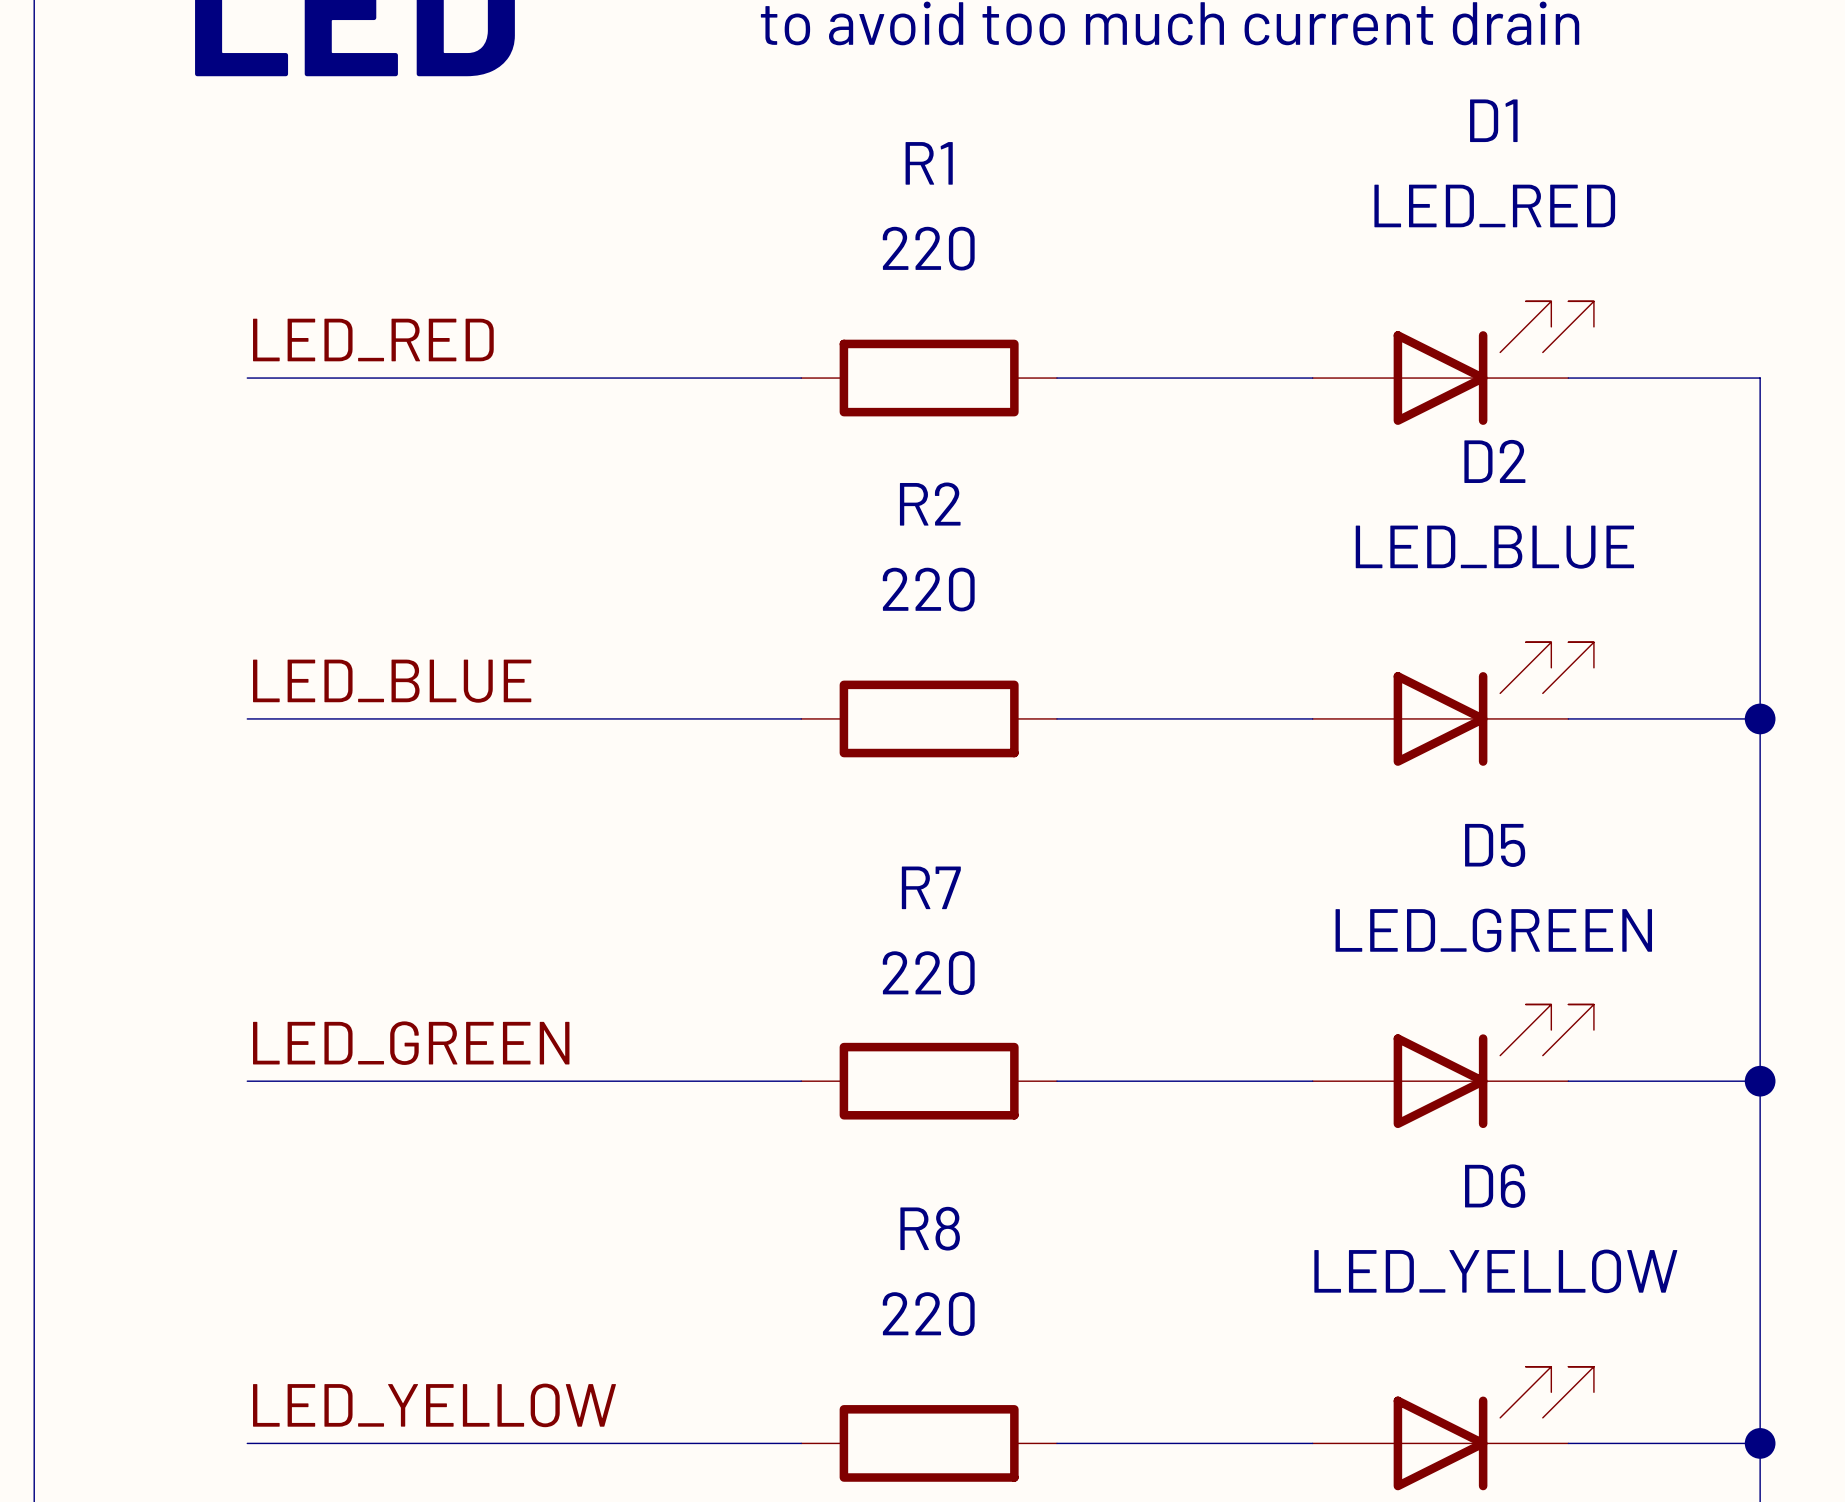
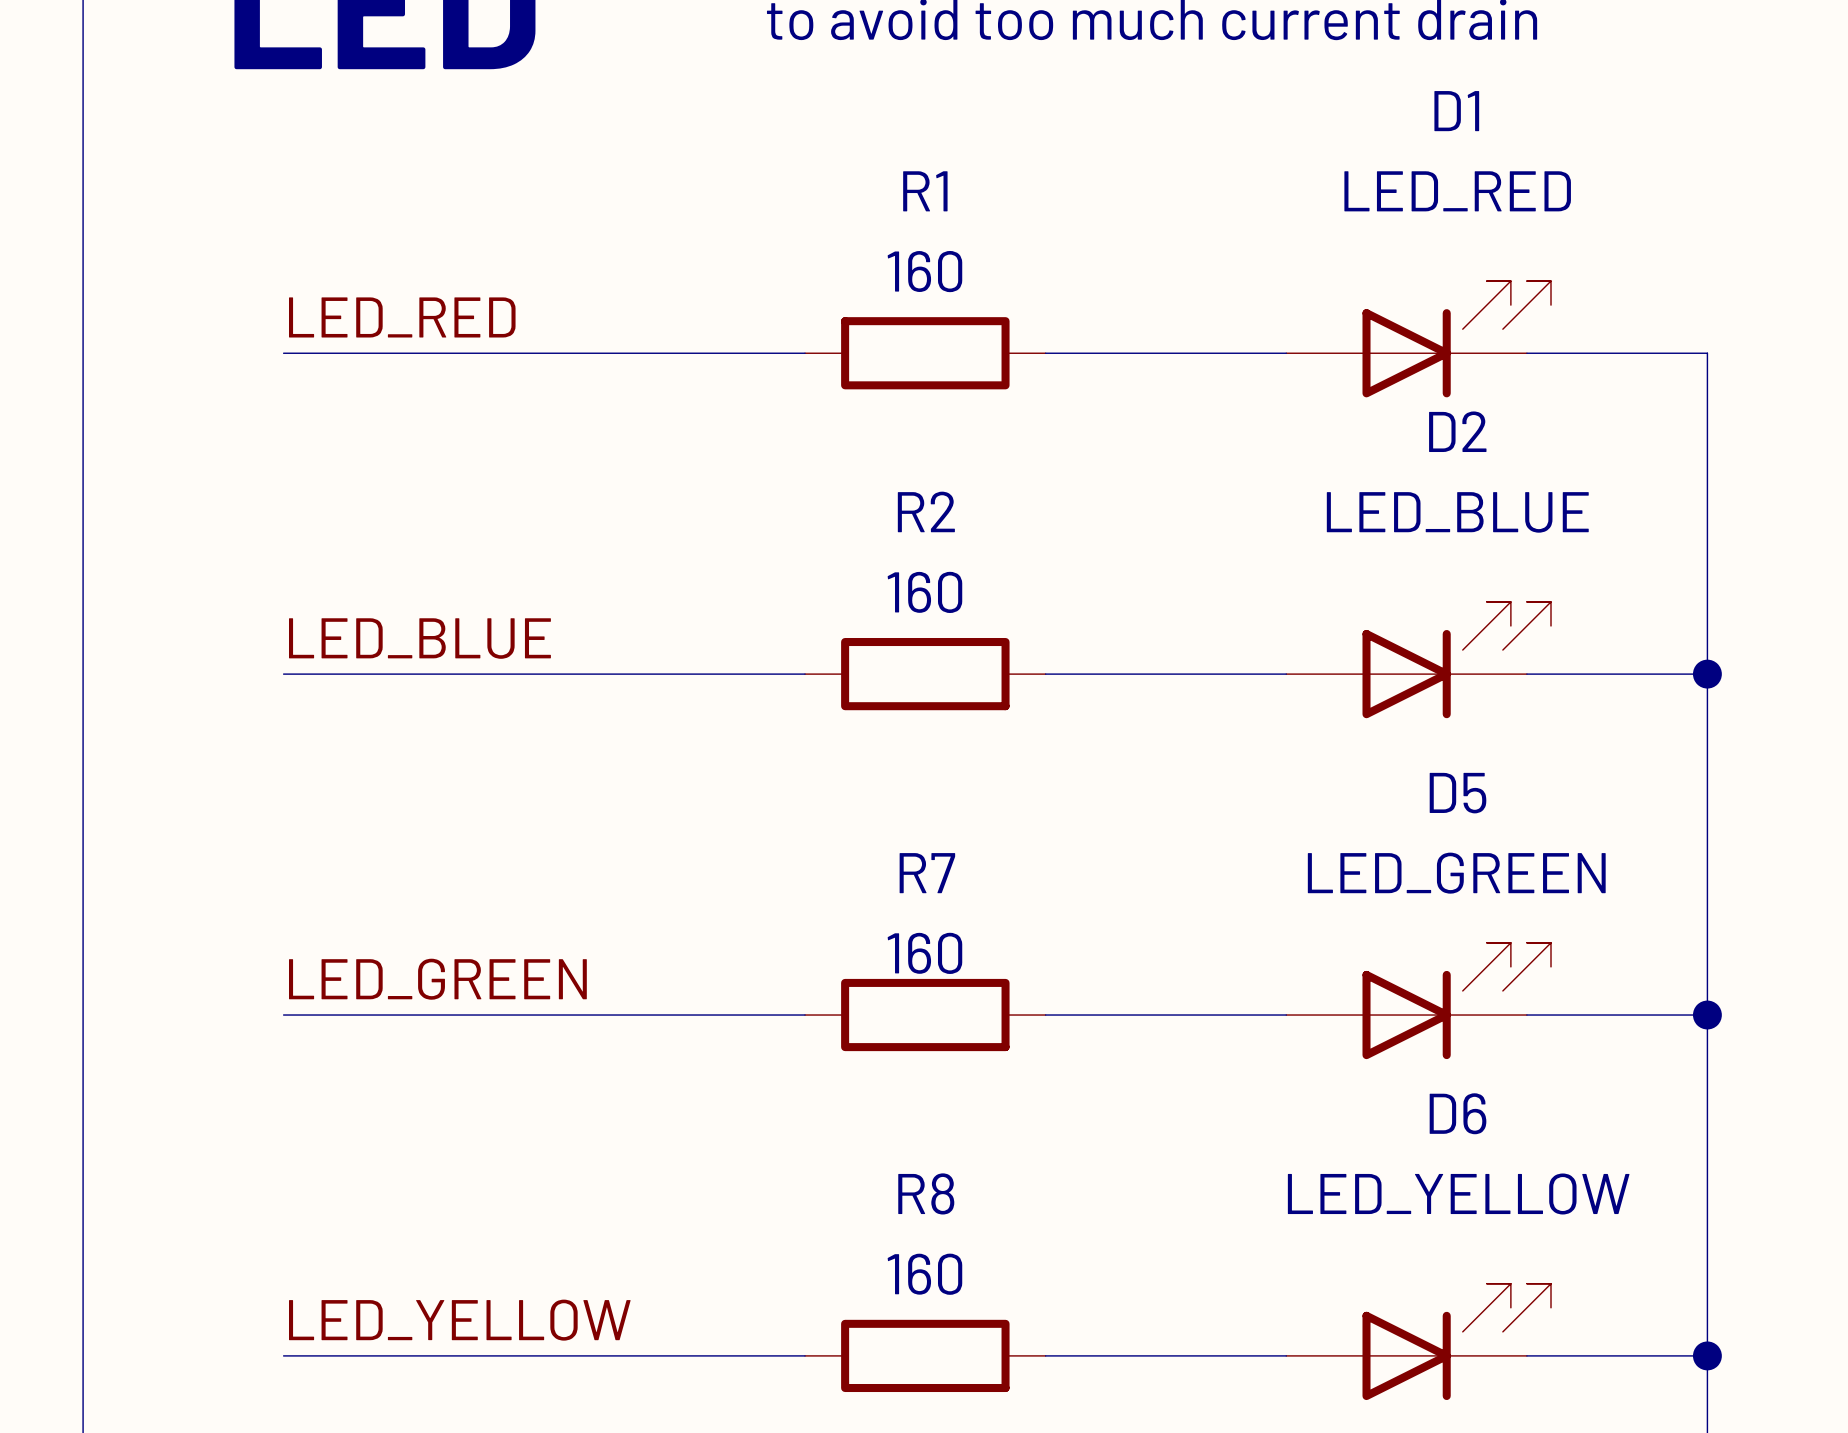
R1 name position: R1 (929, 163) -> R1 (925, 191)
R1 value: 220 (928, 248) -> 160 (924, 271)
R2 name position: R2 (930, 504) -> R2 (926, 511)
R2 value: 220 (928, 589) -> 160 (924, 592)
R7 name position: R7 (931, 887) -> R7 (927, 873)
R7 value: 220 (928, 973) -> 160 (924, 953)
R8 name position: R8 (930, 1228) -> R8 (926, 1193)
R8 value: 220 (928, 1314) -> 160 (924, 1274)

